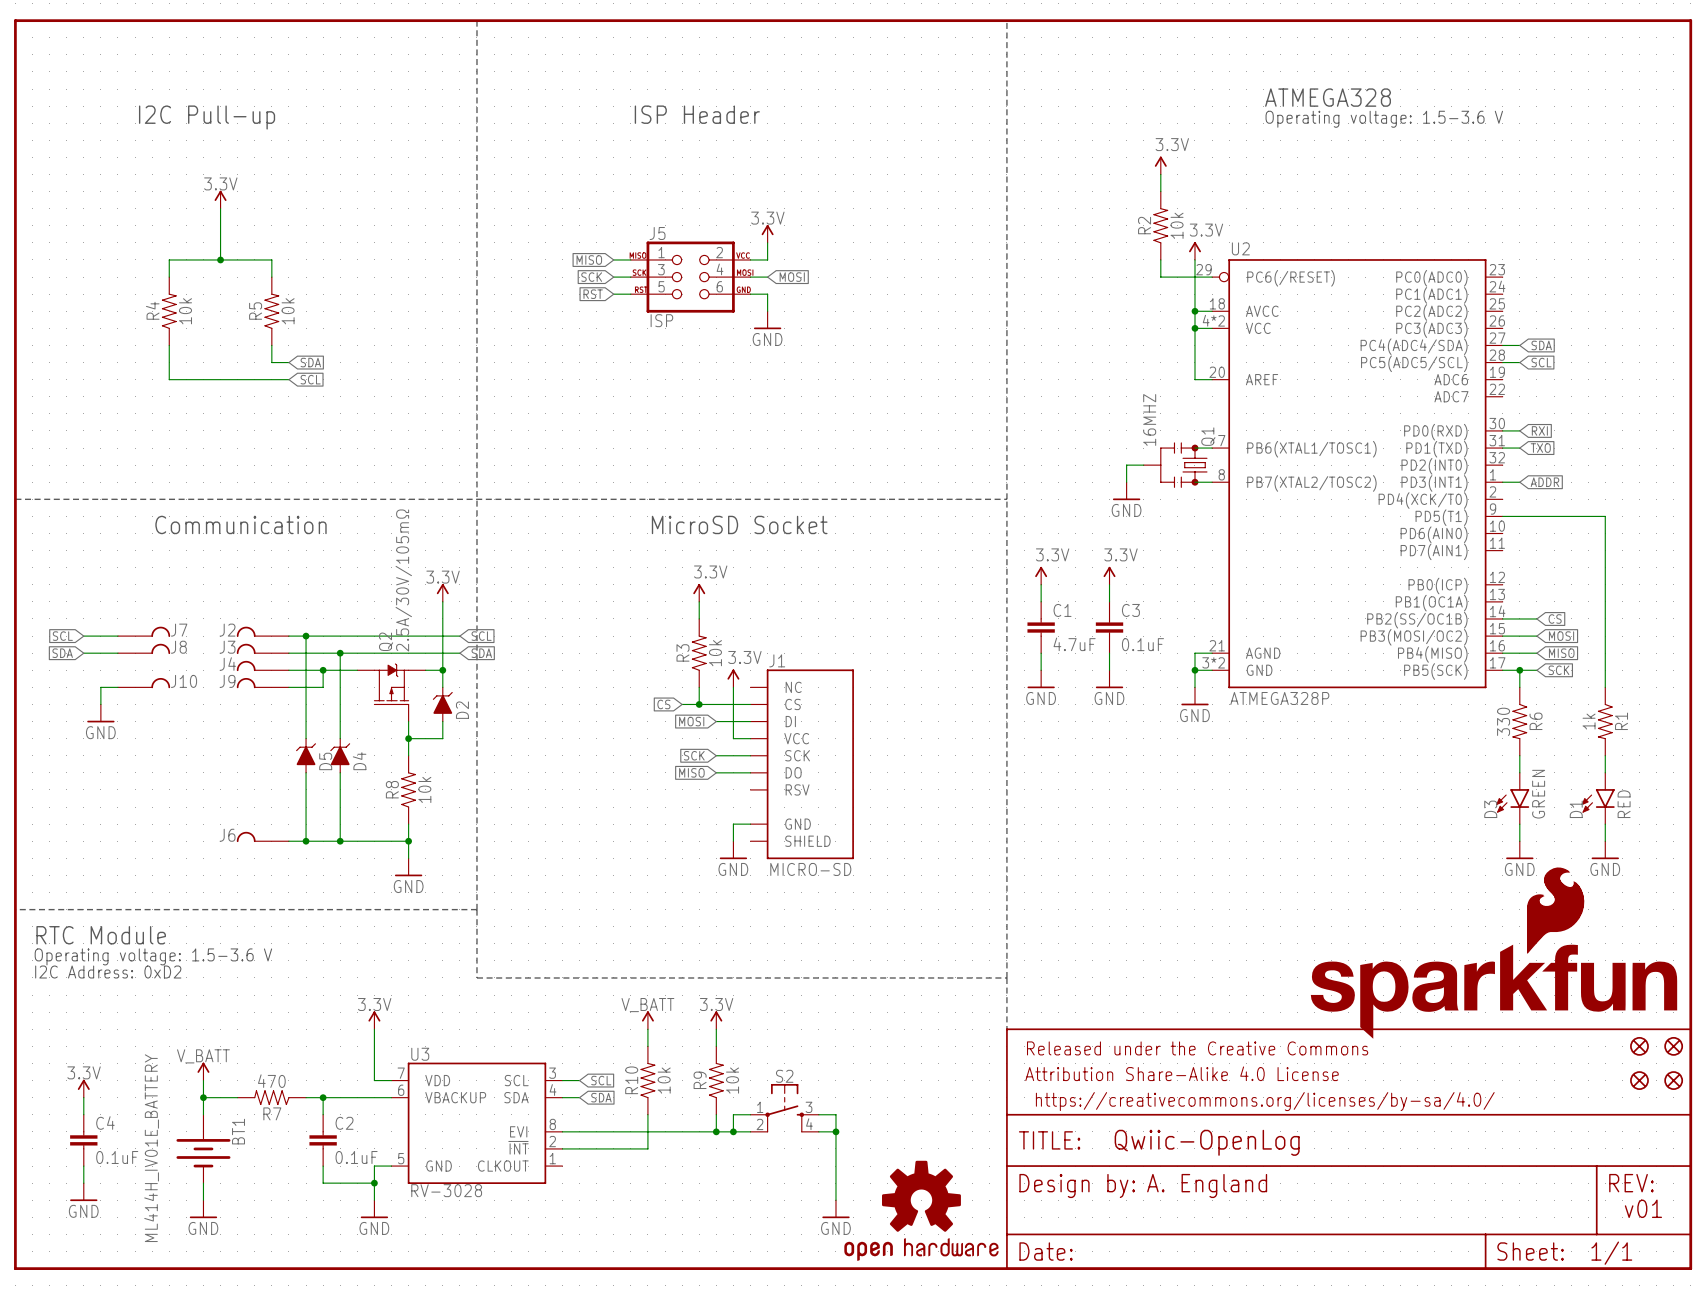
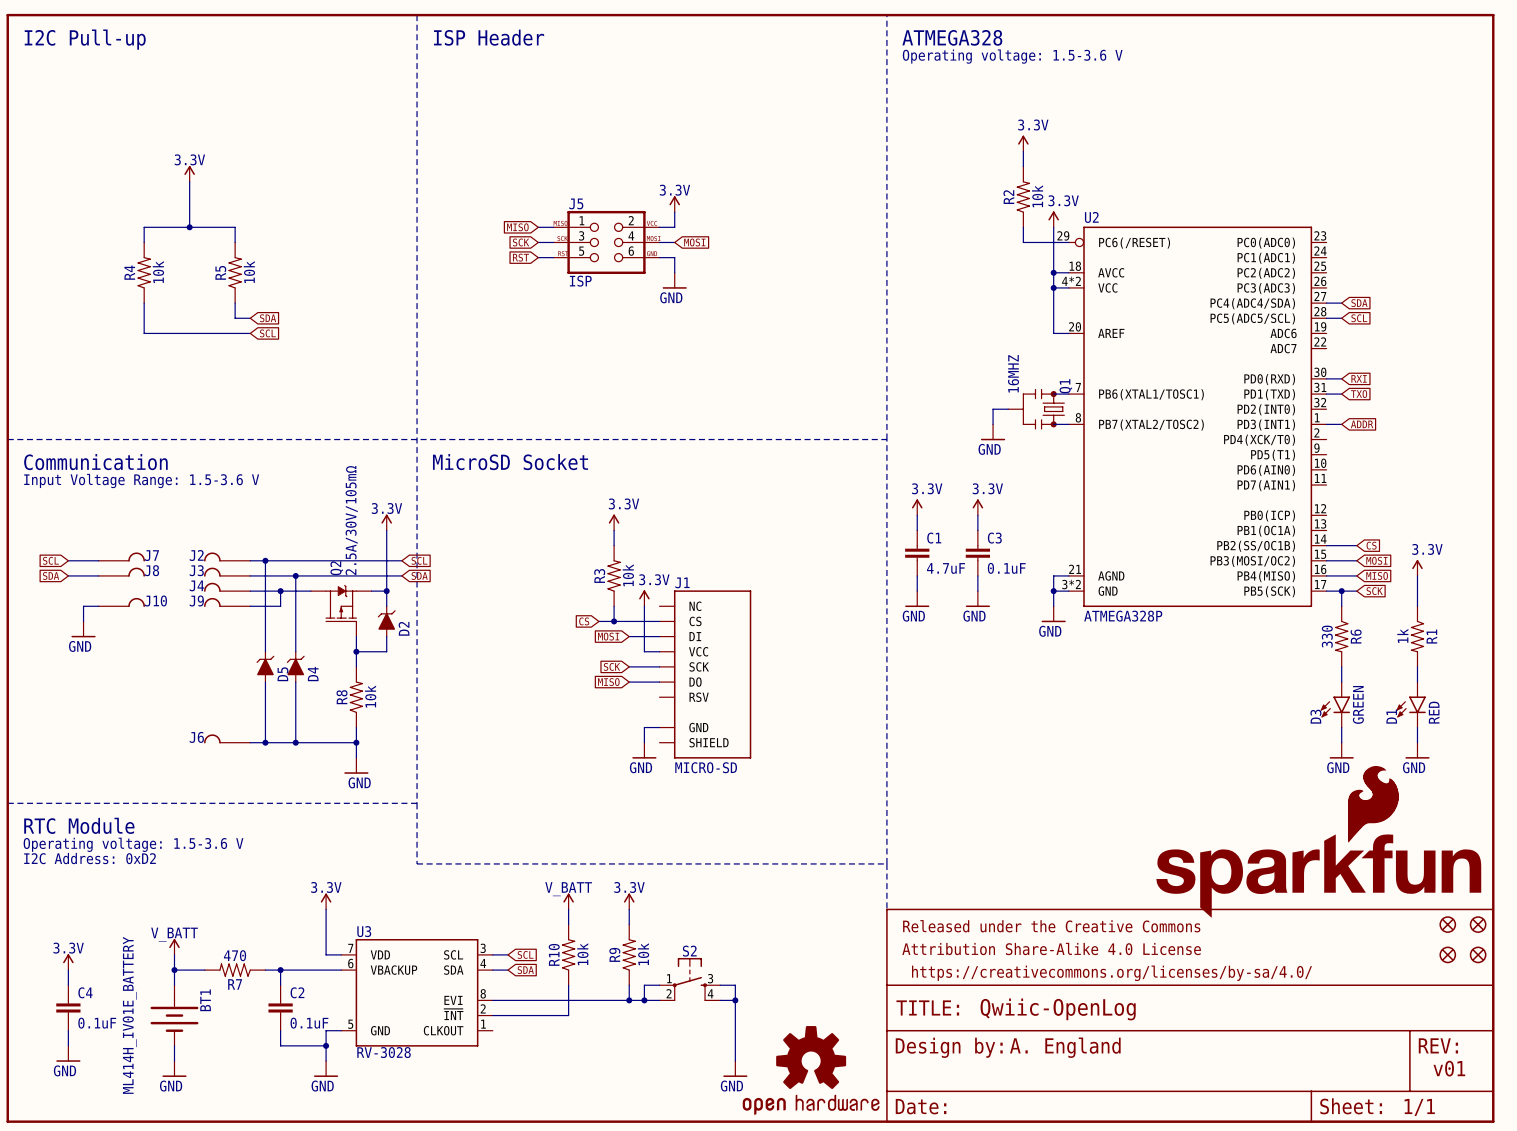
text: none -> ATMEGA328 (952, 37)
text: none -> Operating voltage: 1.5-3.6 V (1012, 56)
text: ATMEGA328 (1328, 97) -> none
text position: ISP Header (697, 114) -> ISP Header (489, 37)
text position: I2C Pull-up (207, 117) -> I2C Pull-up (85, 39)
text: Operating voltage: 1.5-3.6 V (1384, 119) -> none
wire: (1502, 516) (1605, 516) (1605, 653) -> none
text position: Communication (240, 524) -> Communication (95, 462)
text position: MicroSD Socket (739, 524) -> MicroSD Socket (510, 462)
text: none -> Input Voltage Range: 1.5-3.6 V (141, 481)
power symbol: none -> 3.3V (1417, 568)

